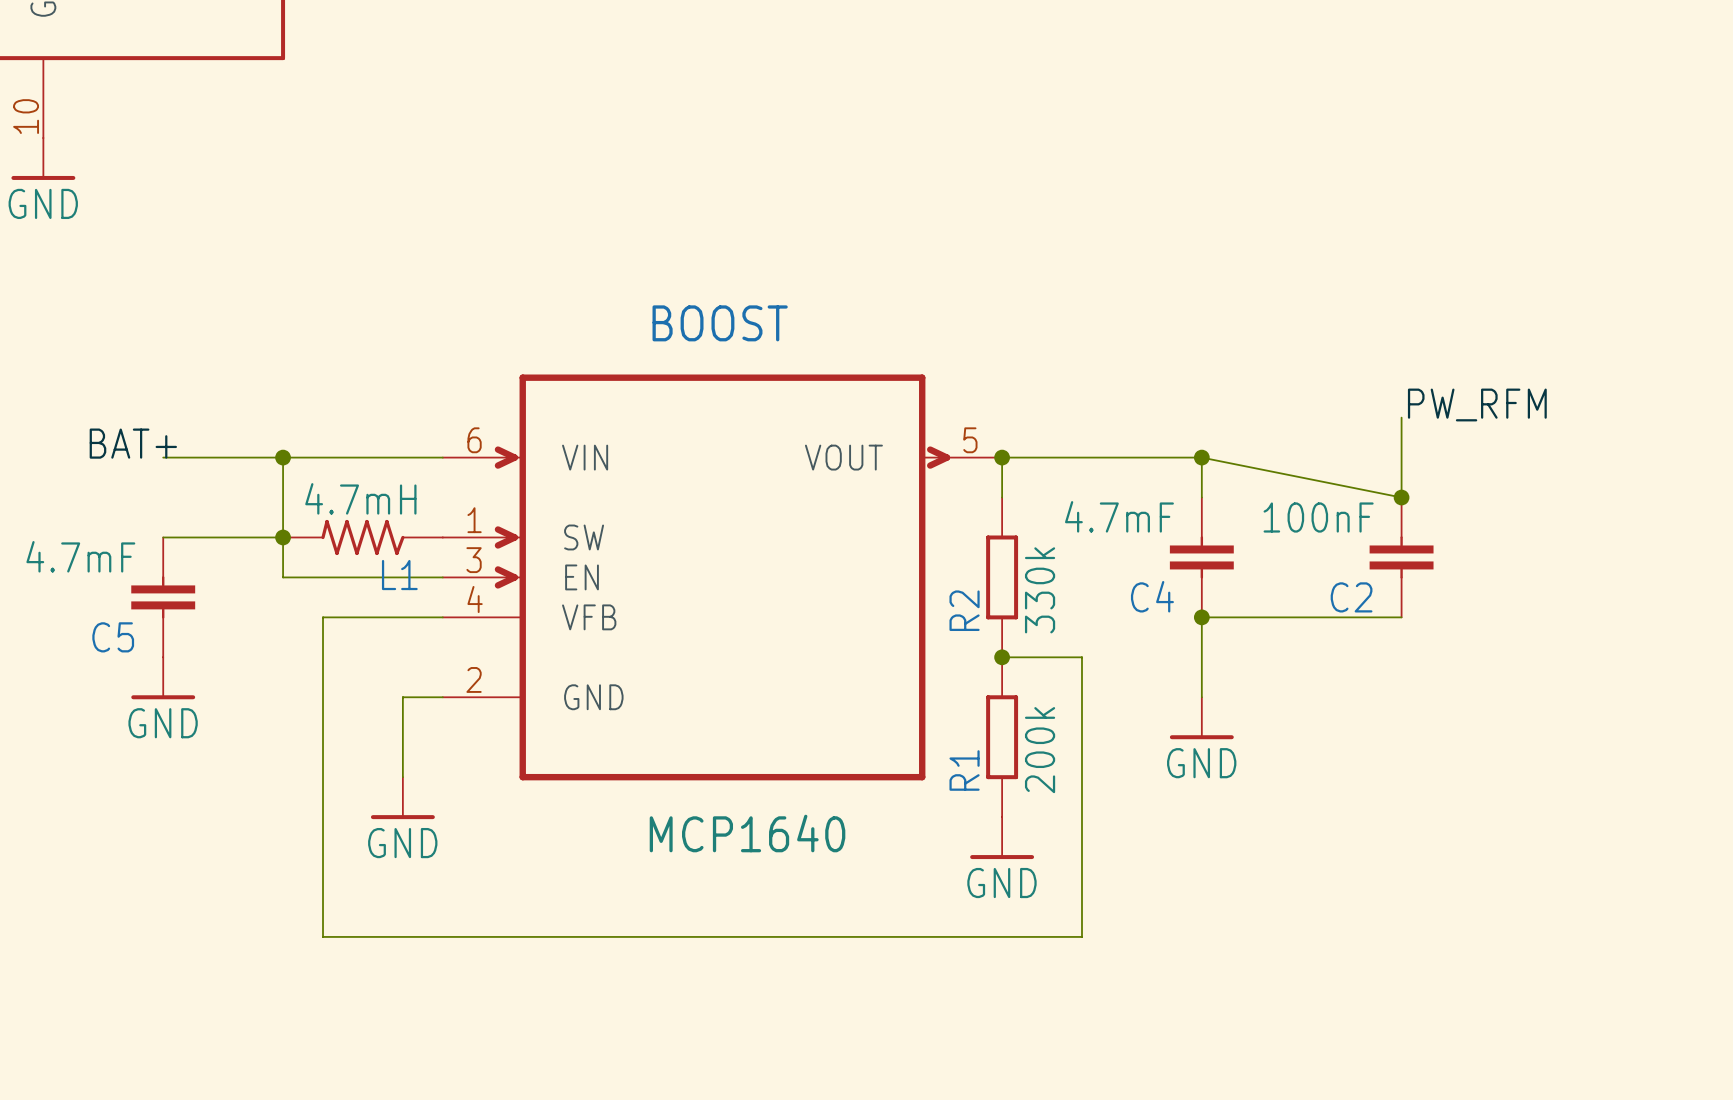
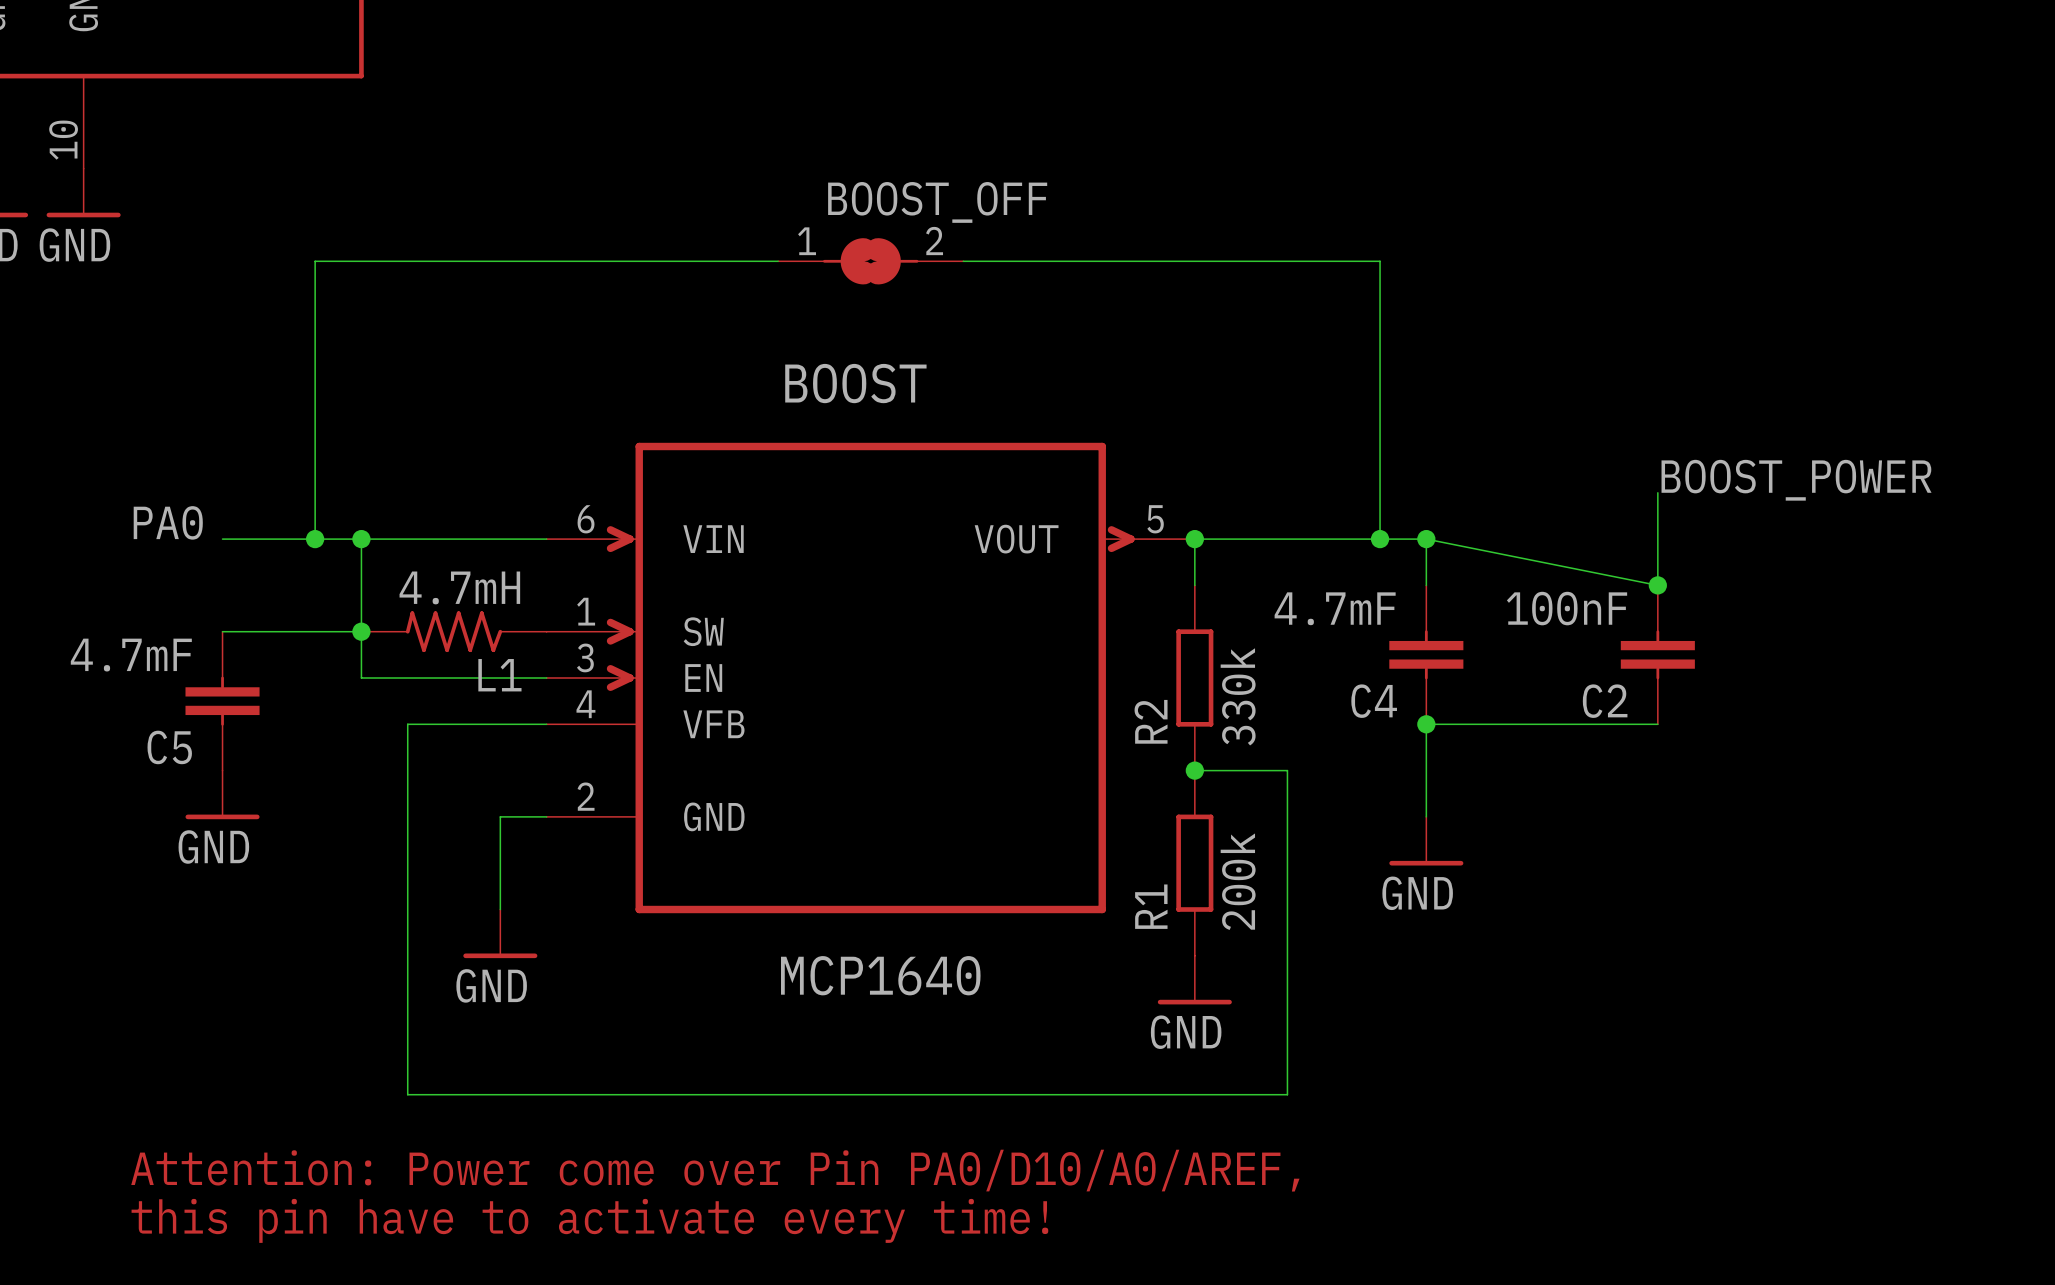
wire: none -> (778, 261) (315, 261) (315, 539)
BOOST_OFF: none -> (870, 261)
wire: none -> (963, 261) (1380, 261) (1380, 539)
label: PW_RFM (1477, 404) -> BOOST_POWER (1796, 480)
label: BAT+ (133, 443) -> PA0 (168, 522)
junction: none -> (315, 539)
junction: none -> (1380, 539)
text: none -> Attention: Power come over Pin PA0/D10/A0/AREF, (715, 1170)
text: none -> this pin have to activate every time! (589, 1220)

